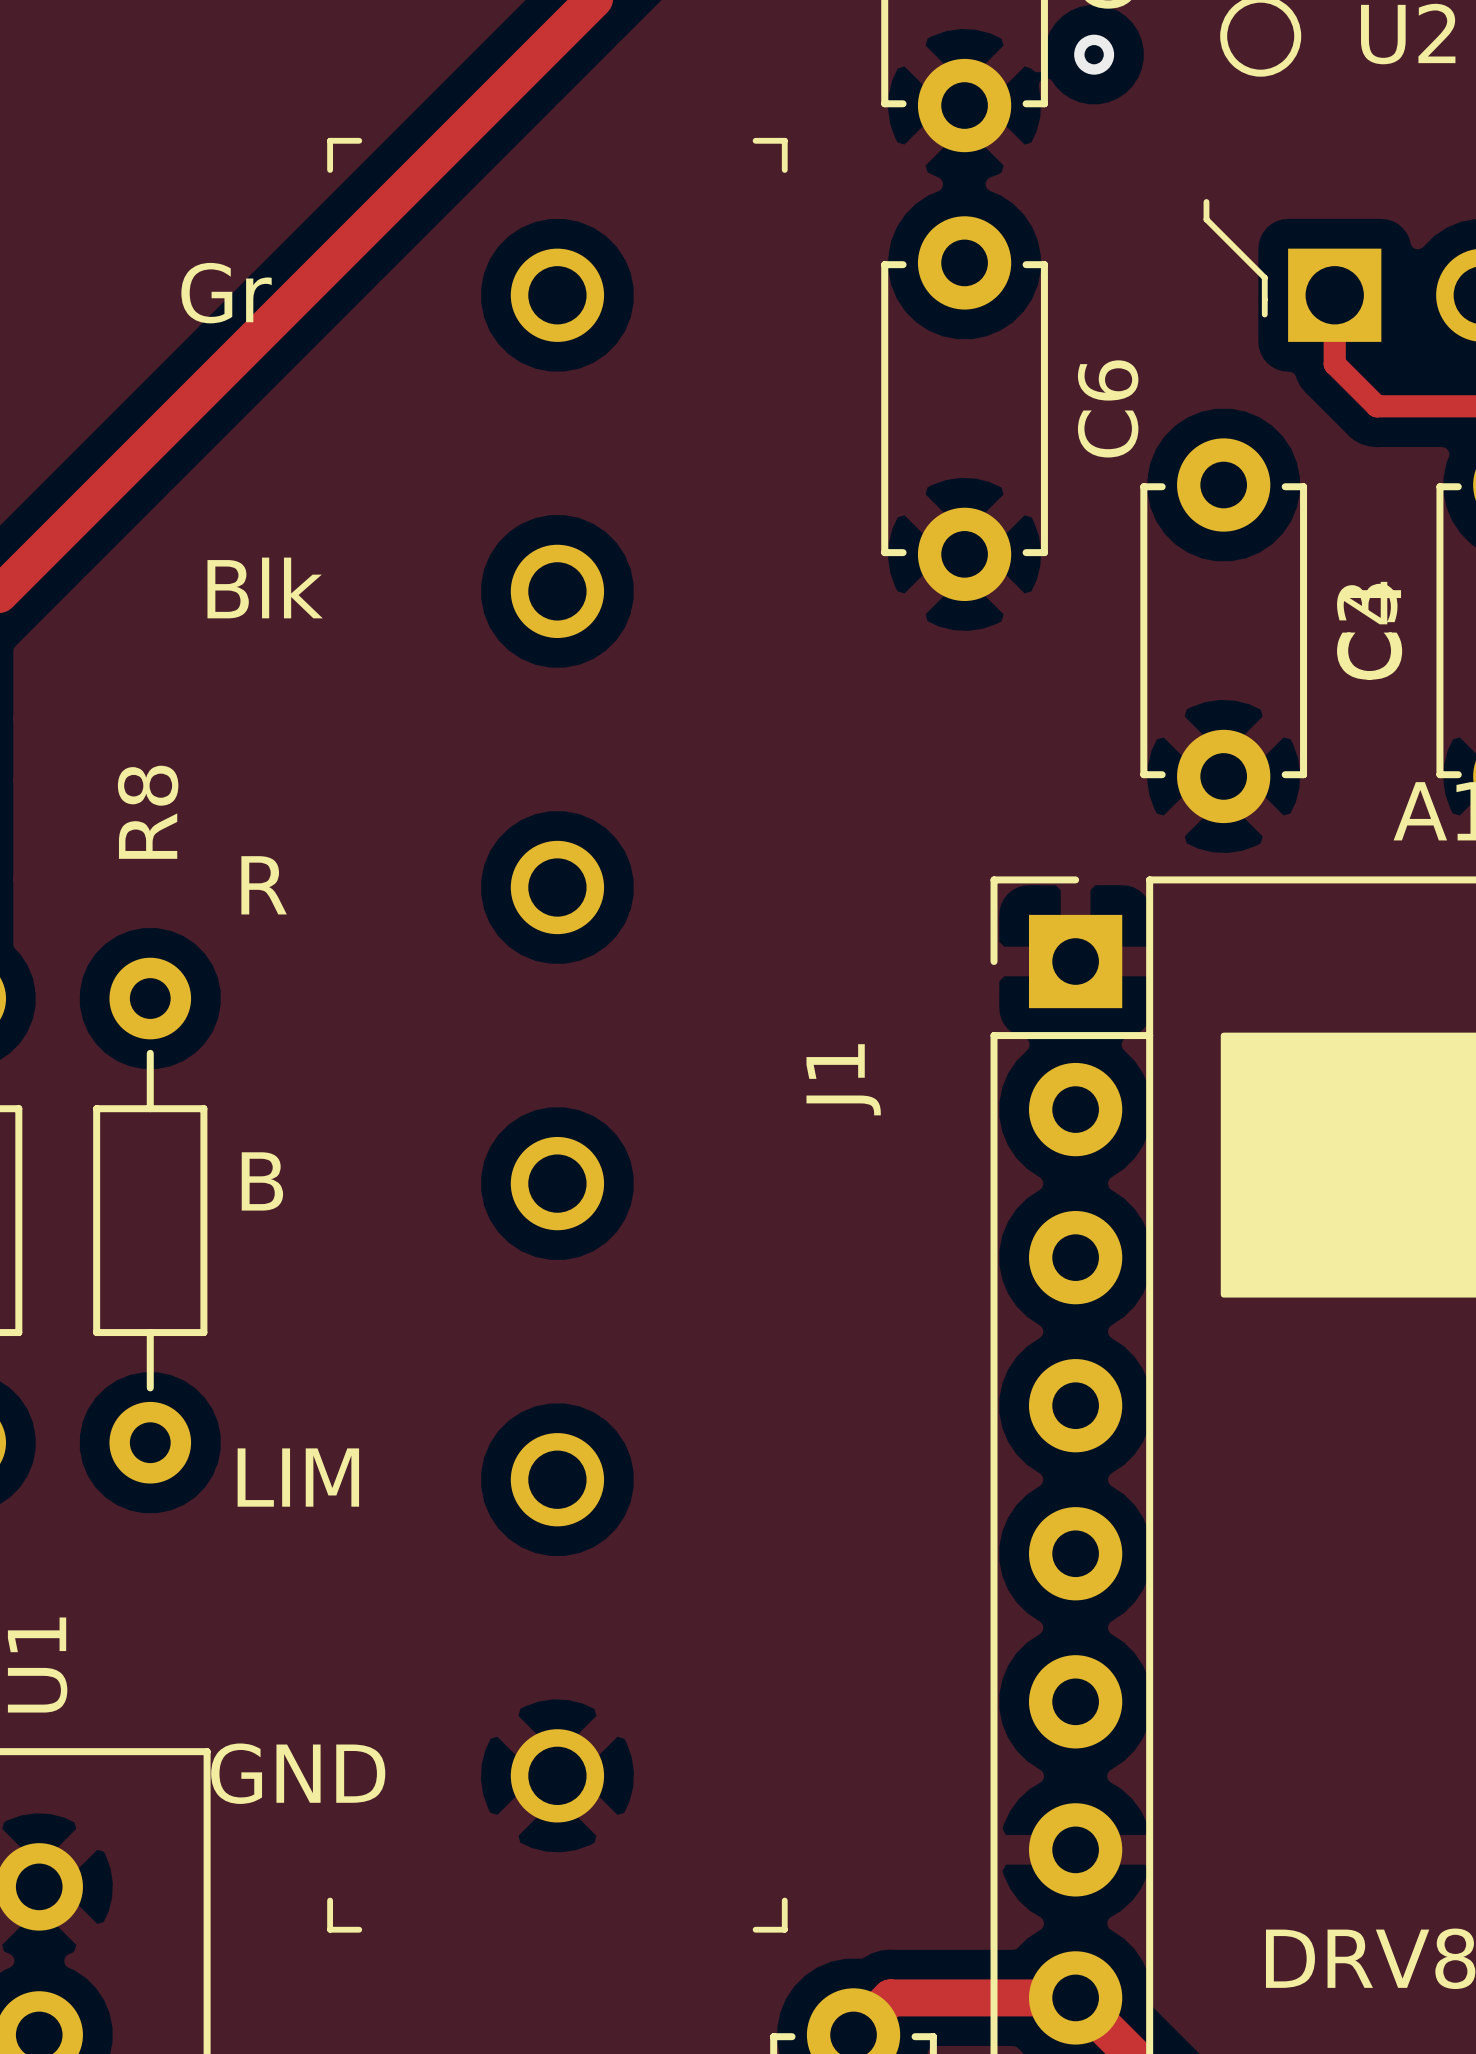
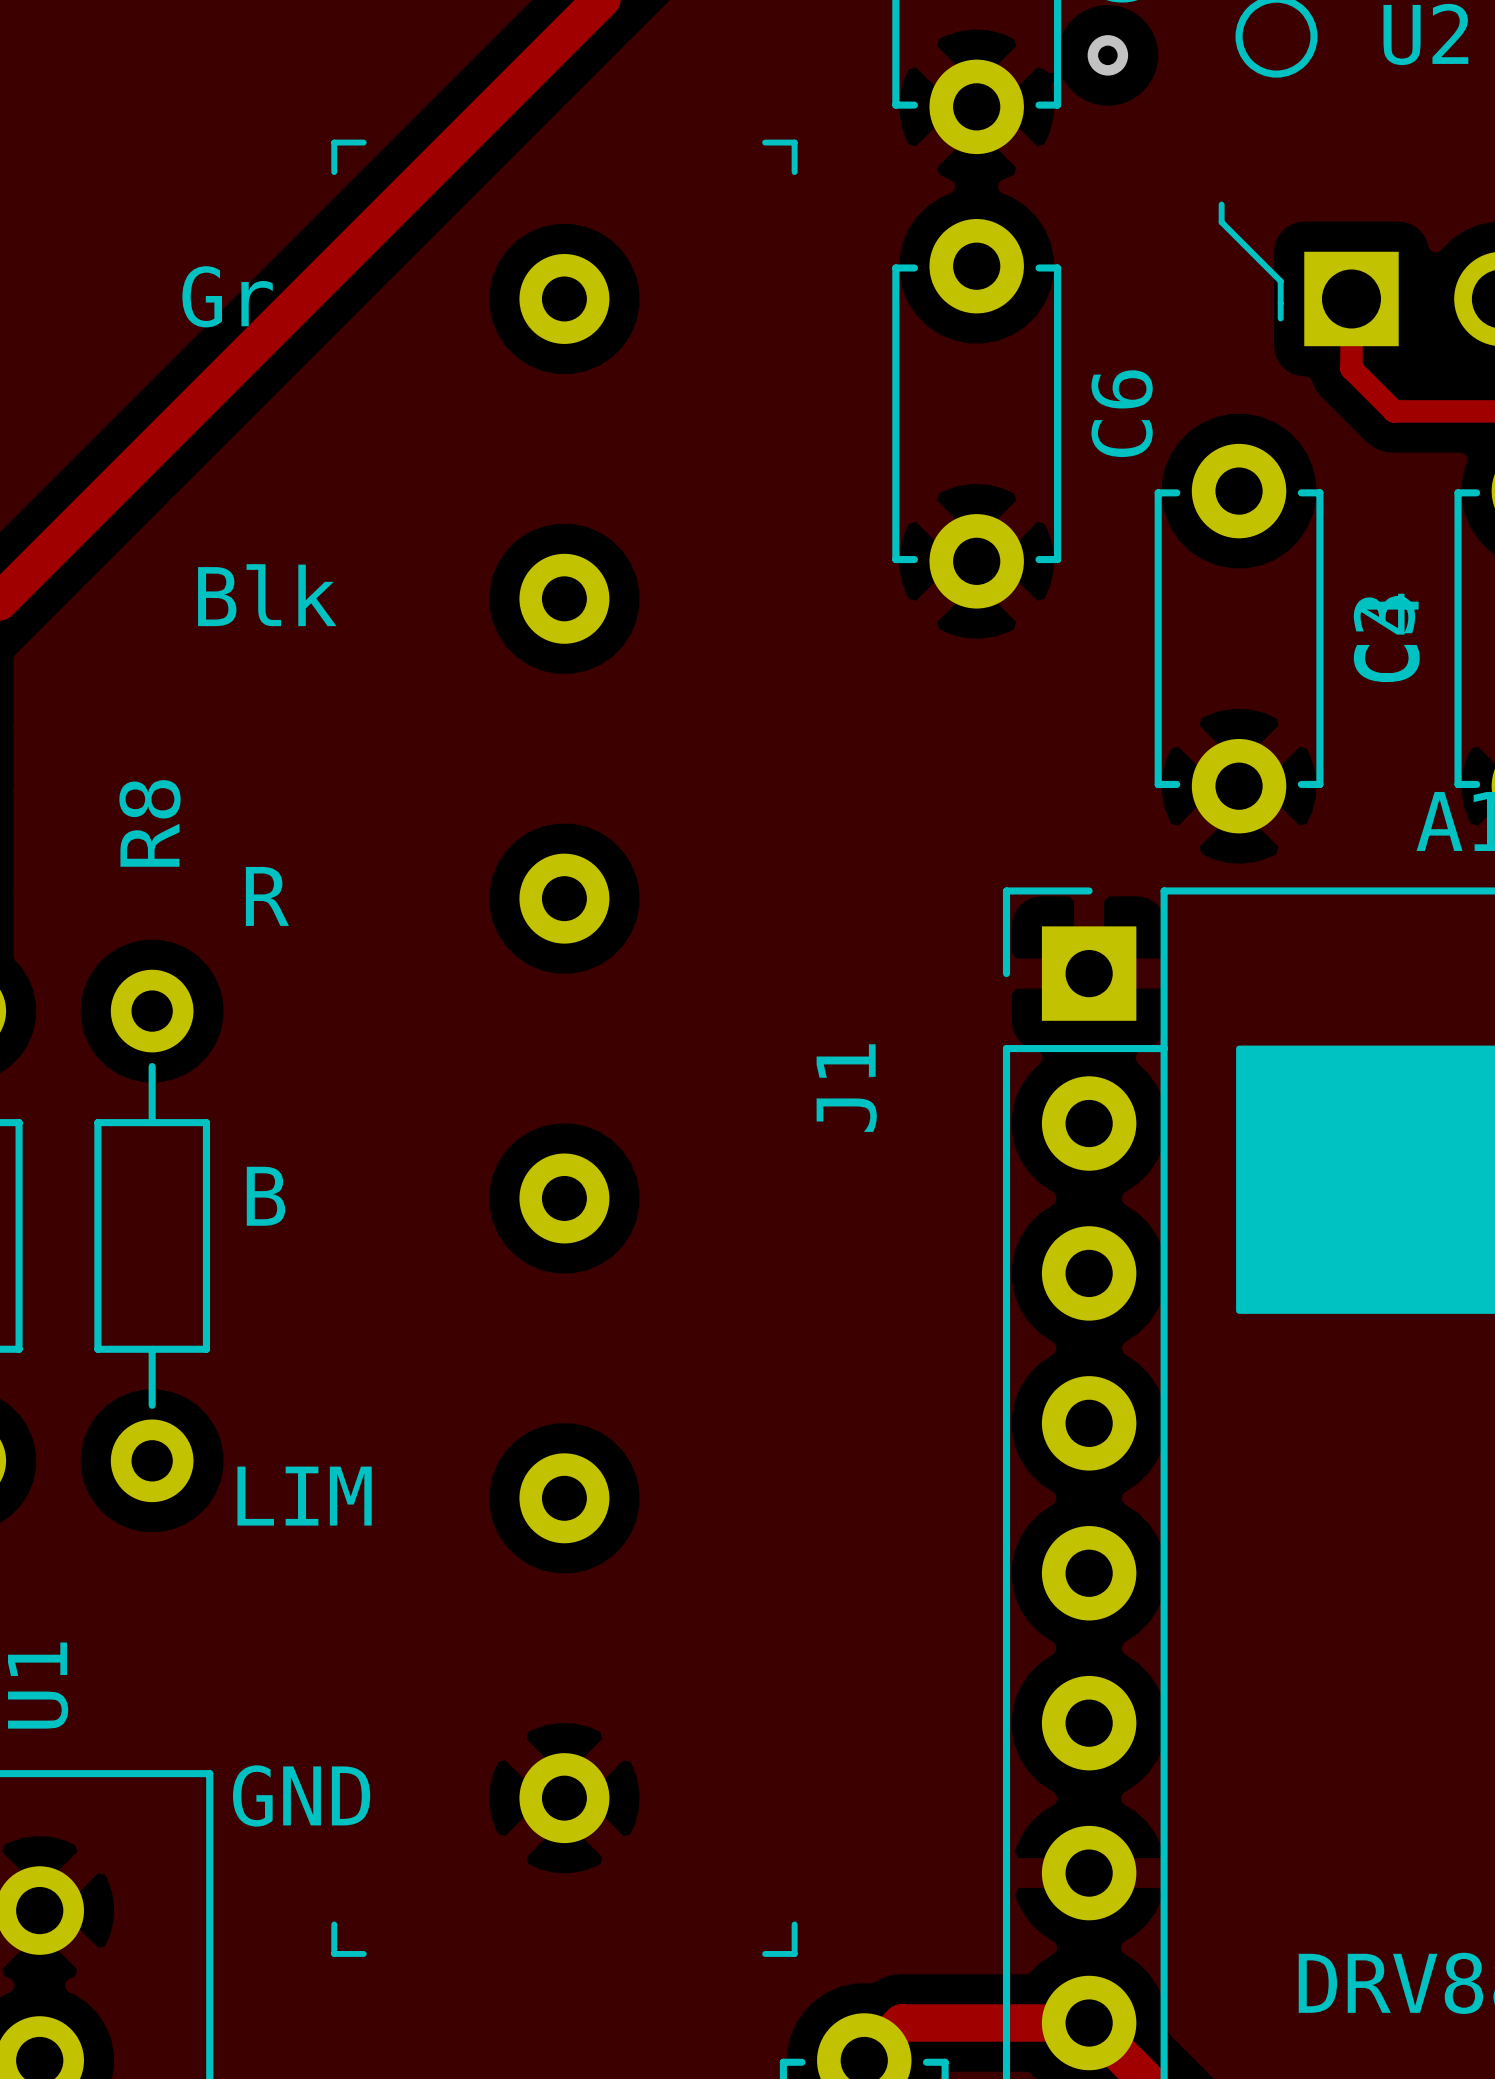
J1 footprint: [327, 137, 788, 1933] -> [331, 139, 798, 1957]

